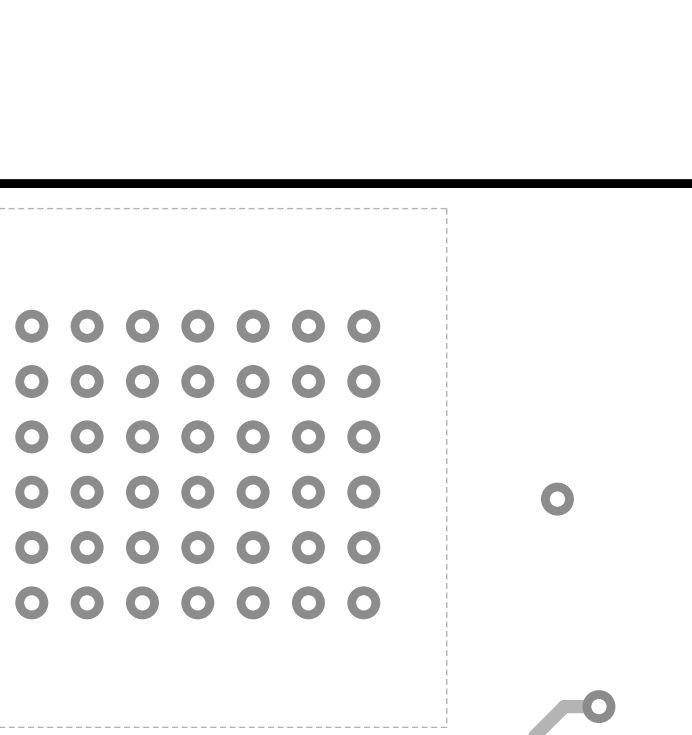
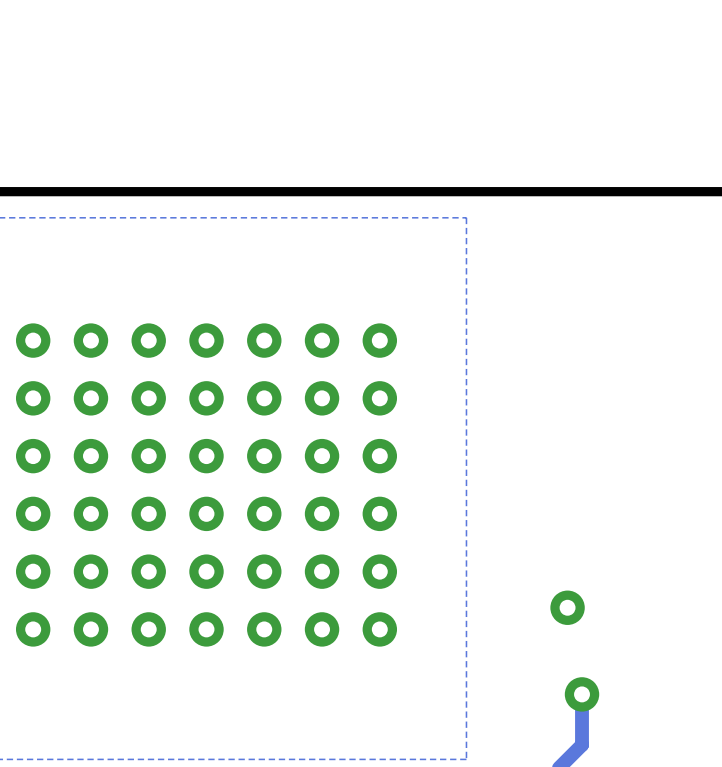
via: (557, 499) -> none
via: none -> (567, 607)
track: (598, 706) (564, 706) (557, 713) -> (582, 694) (582, 744)
via position: (598, 706) -> (582, 694)

